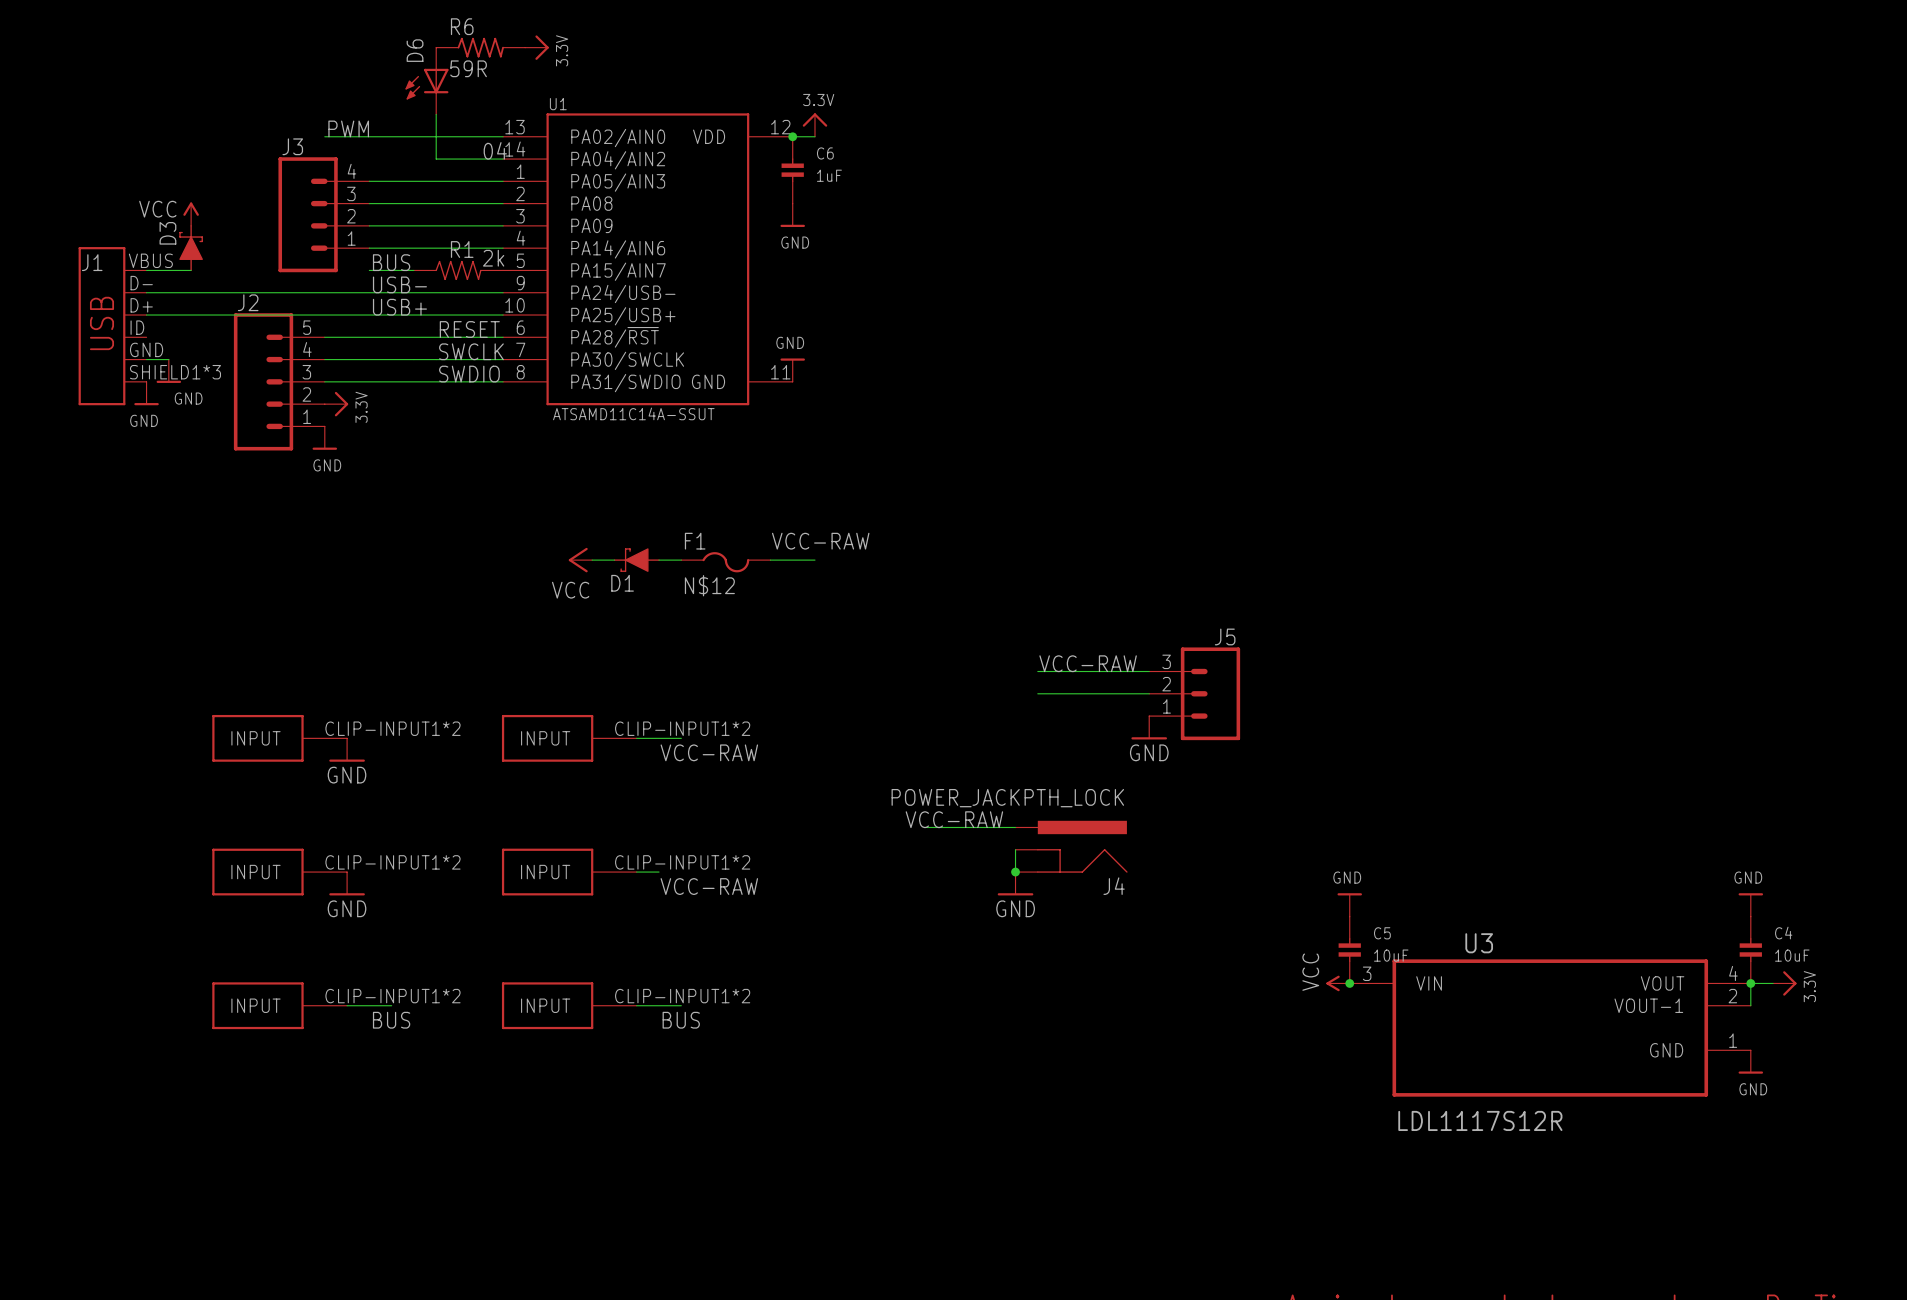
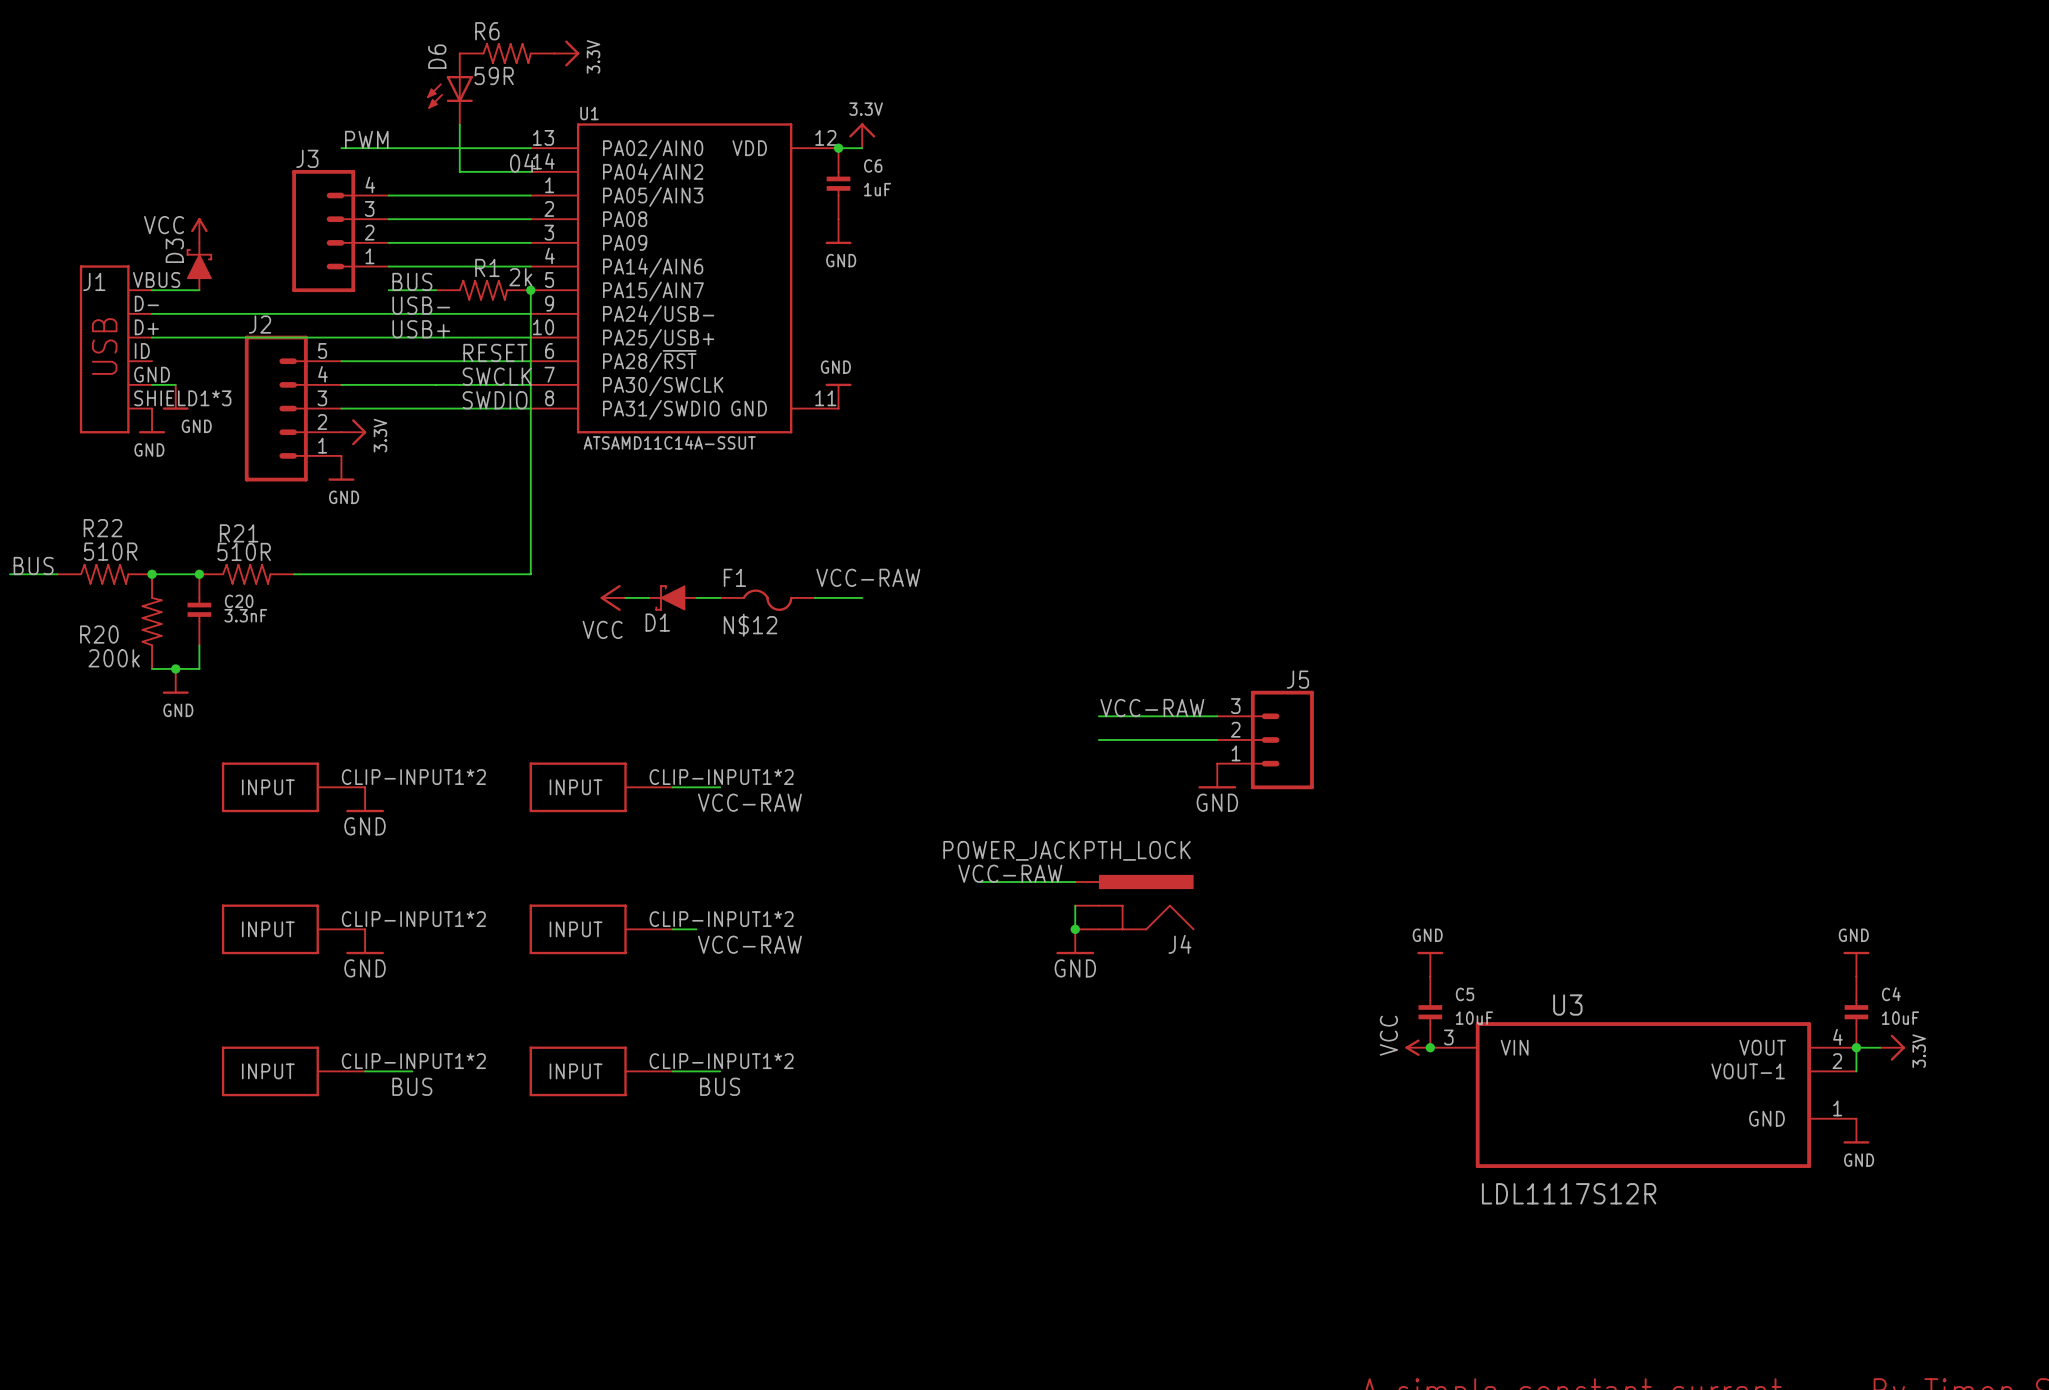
wire: none -> (530, 290) (530, 574) (294, 574)
junction: none -> (530, 290)
label: none -> BUS (33, 565)
wire: none -> (10, 574) (57, 574)
R22: none -> 510R (104, 574)
wire: none -> (152, 574) (199, 574)
junction: none -> (152, 574)
junction: none -> (199, 574)
R21: none -> 510R (246, 574)
C20: none -> 3.3nF (199, 609)
R20: none -> 200k (152, 621)
wire: none -> (199, 645) (199, 668) (152, 668)
junction: none -> (175, 668)
power symbol: none -> GND (175, 681)

